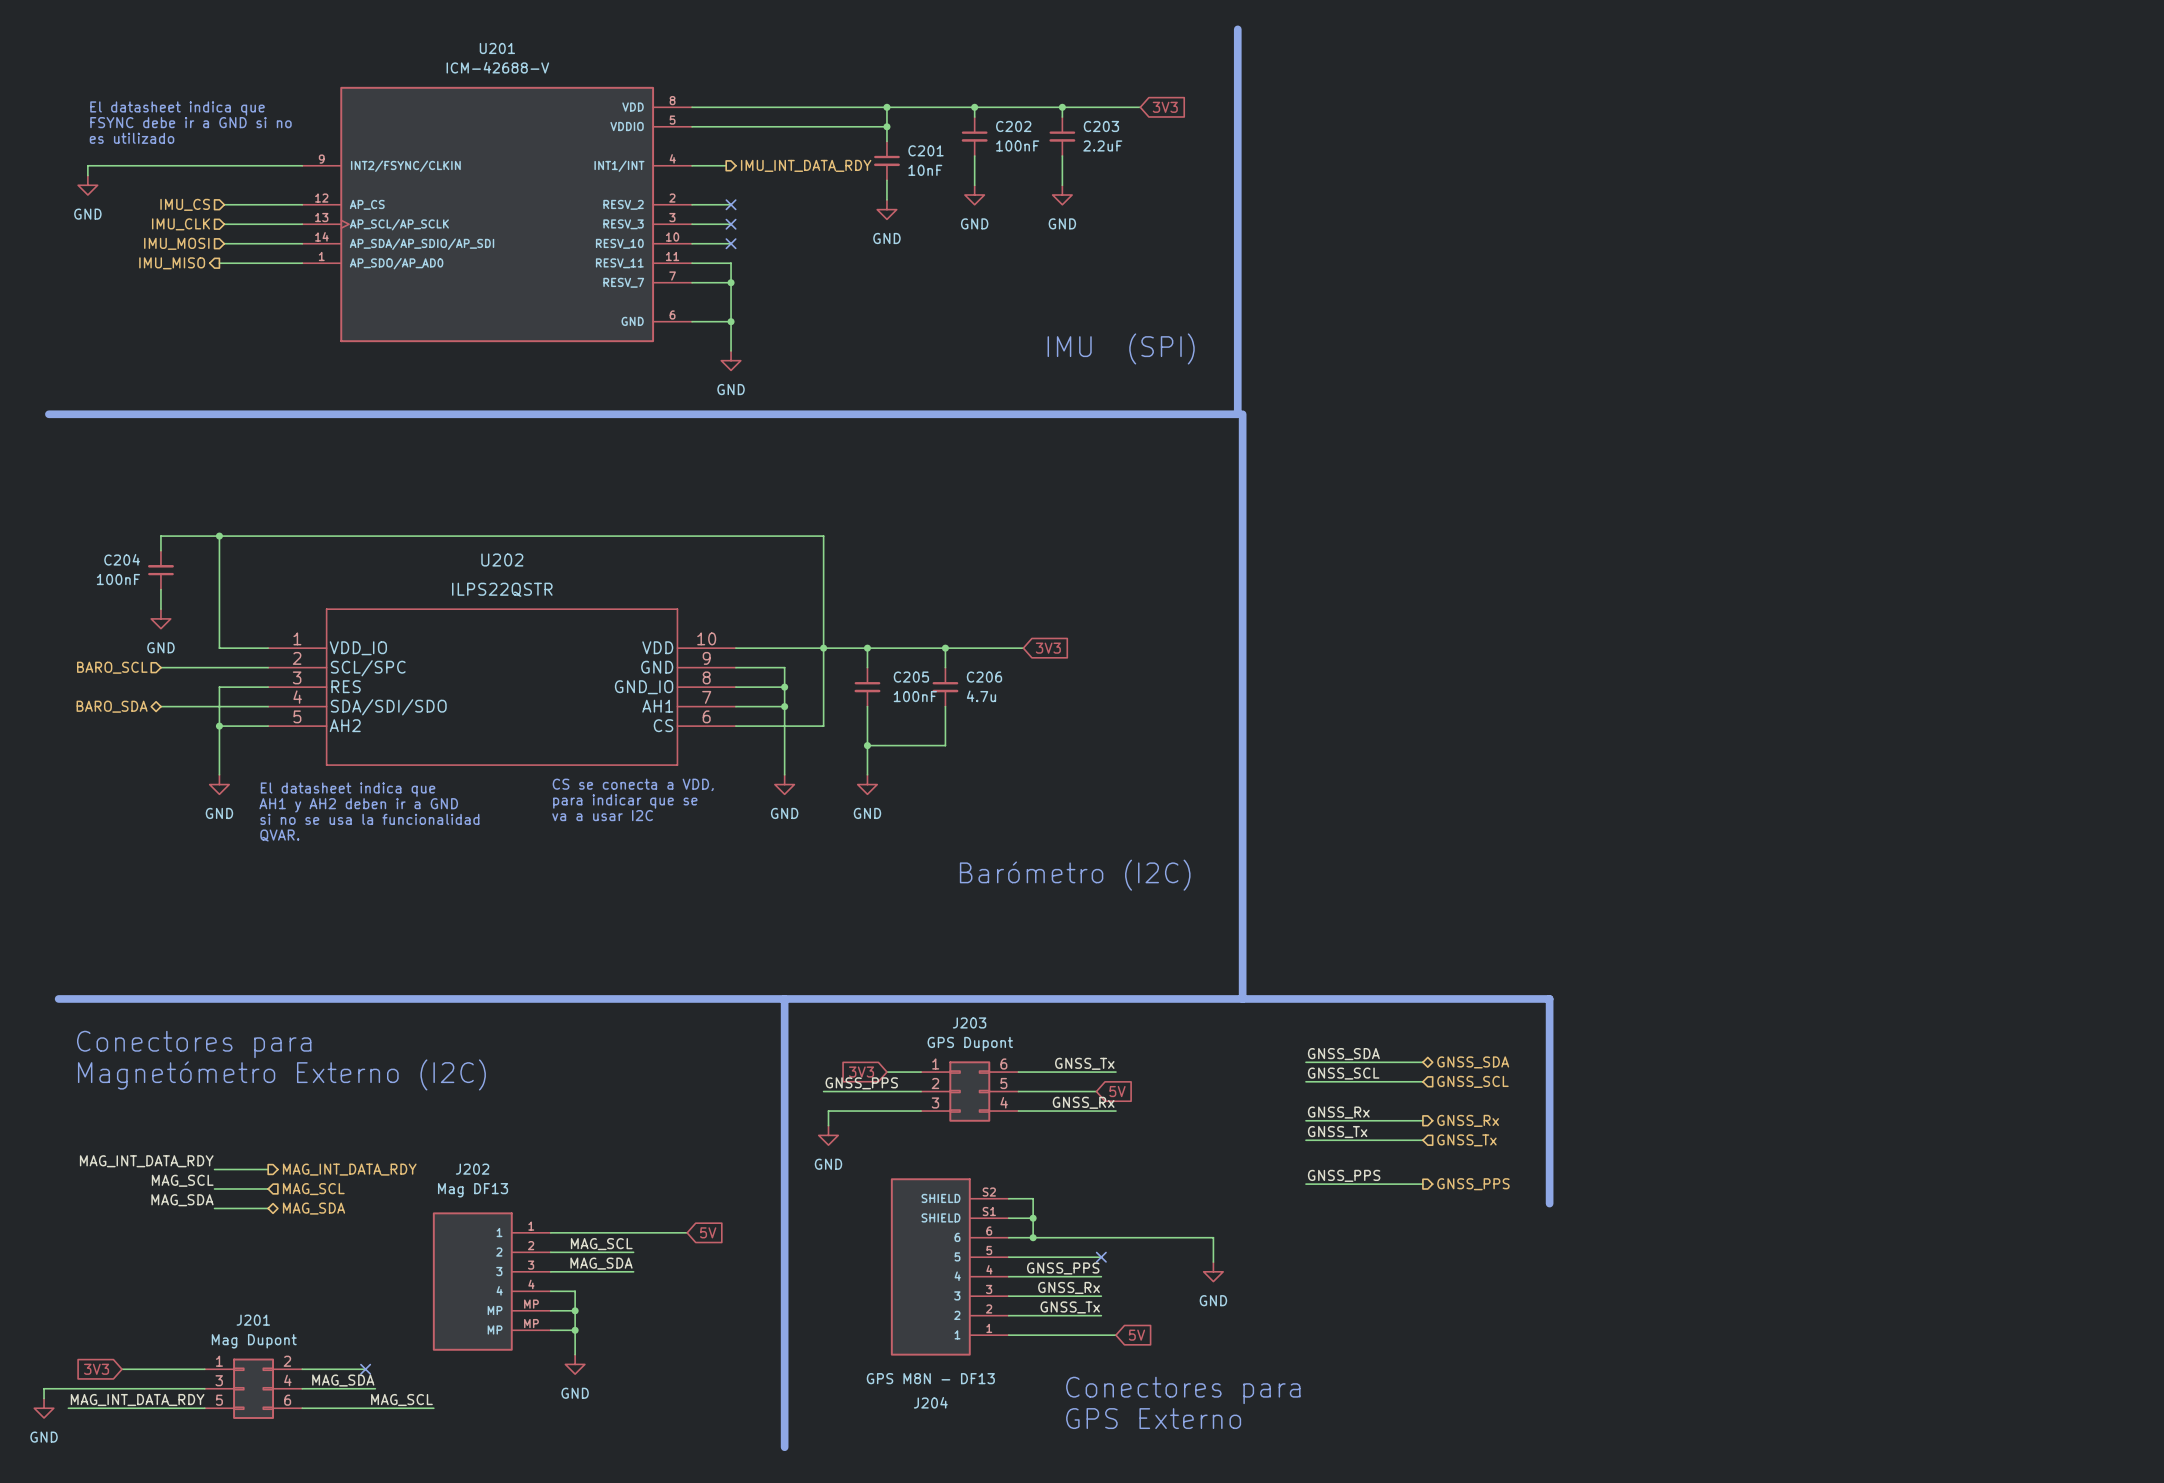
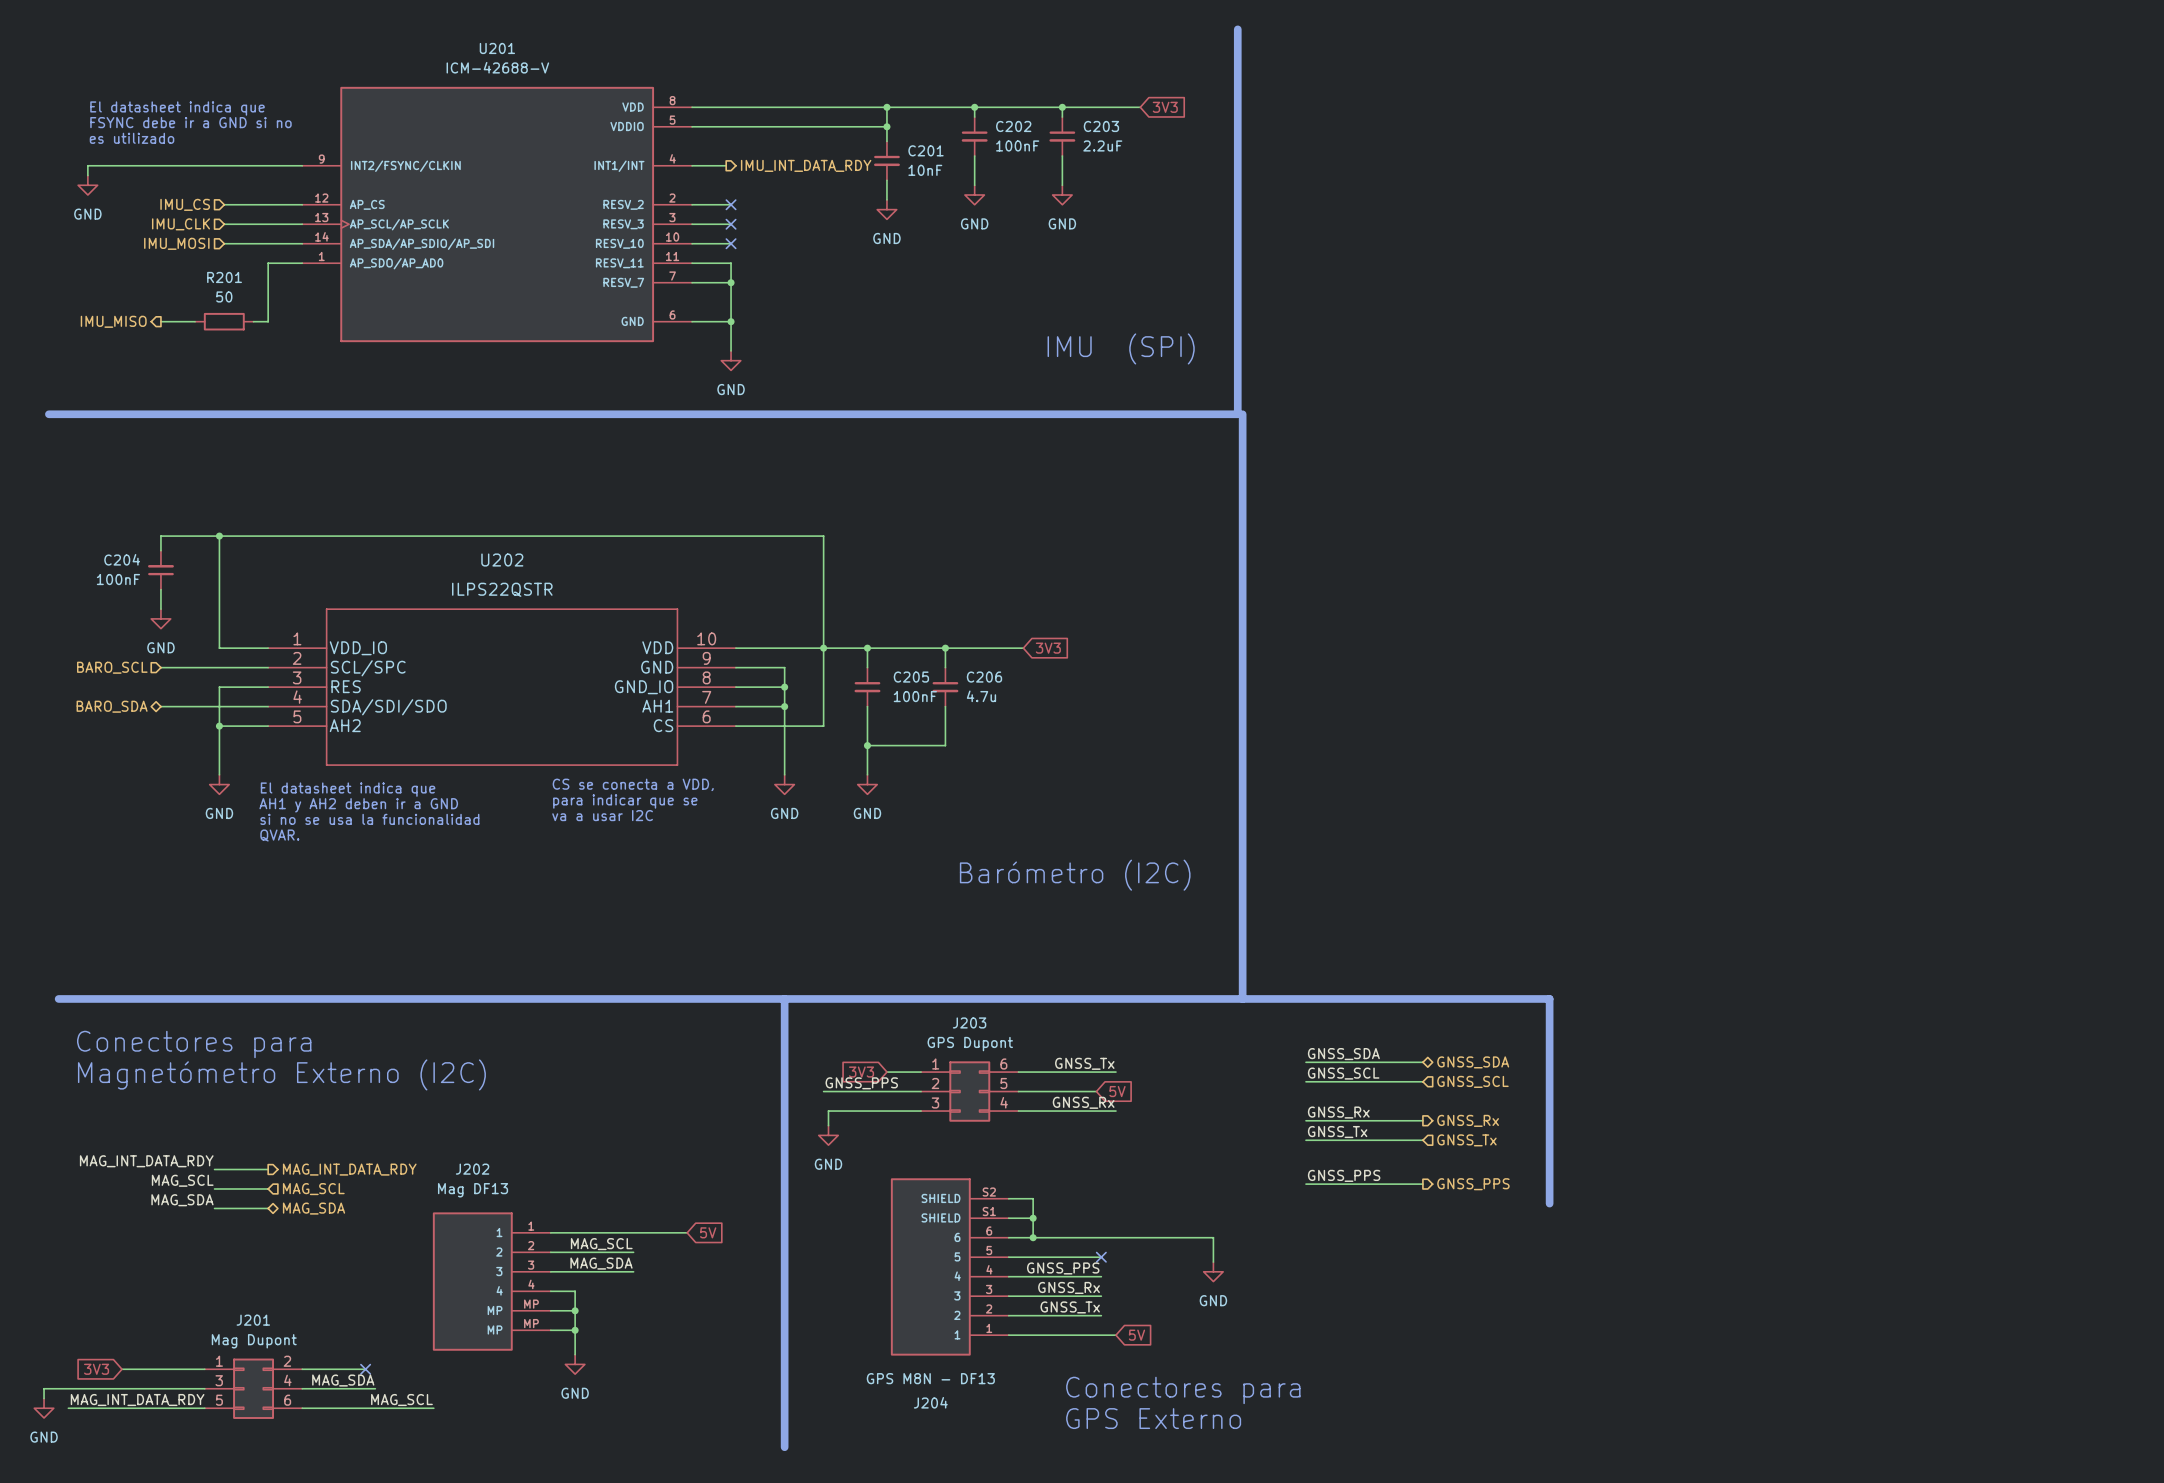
hierarchical label position: IMU_MISO (172, 263) -> IMU_MISO (113, 321)
wire: (219, 263) (268, 263) -> (253, 321) (268, 321) (268, 263)
wire: none -> (160, 321) (195, 321)
R201: none -> 50 (224, 321)

